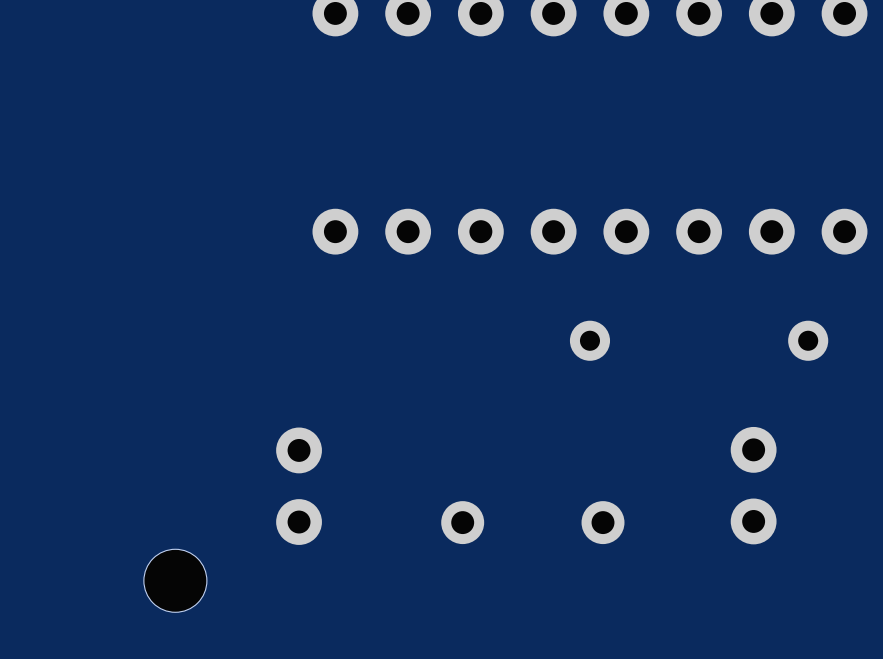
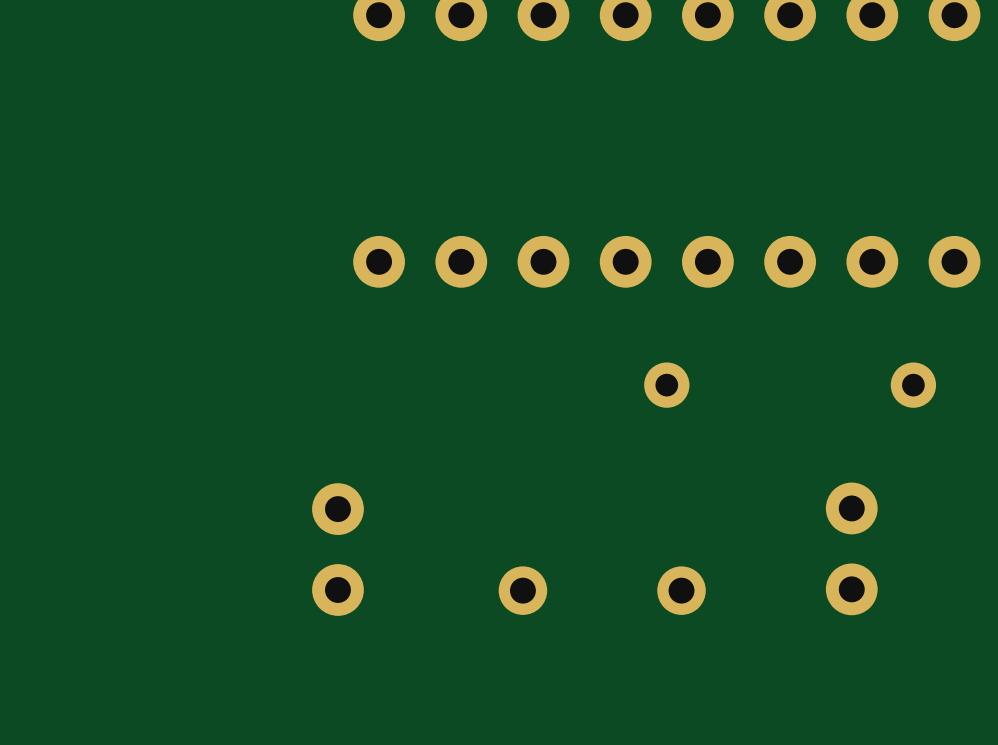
part: (175, 580) -> none

